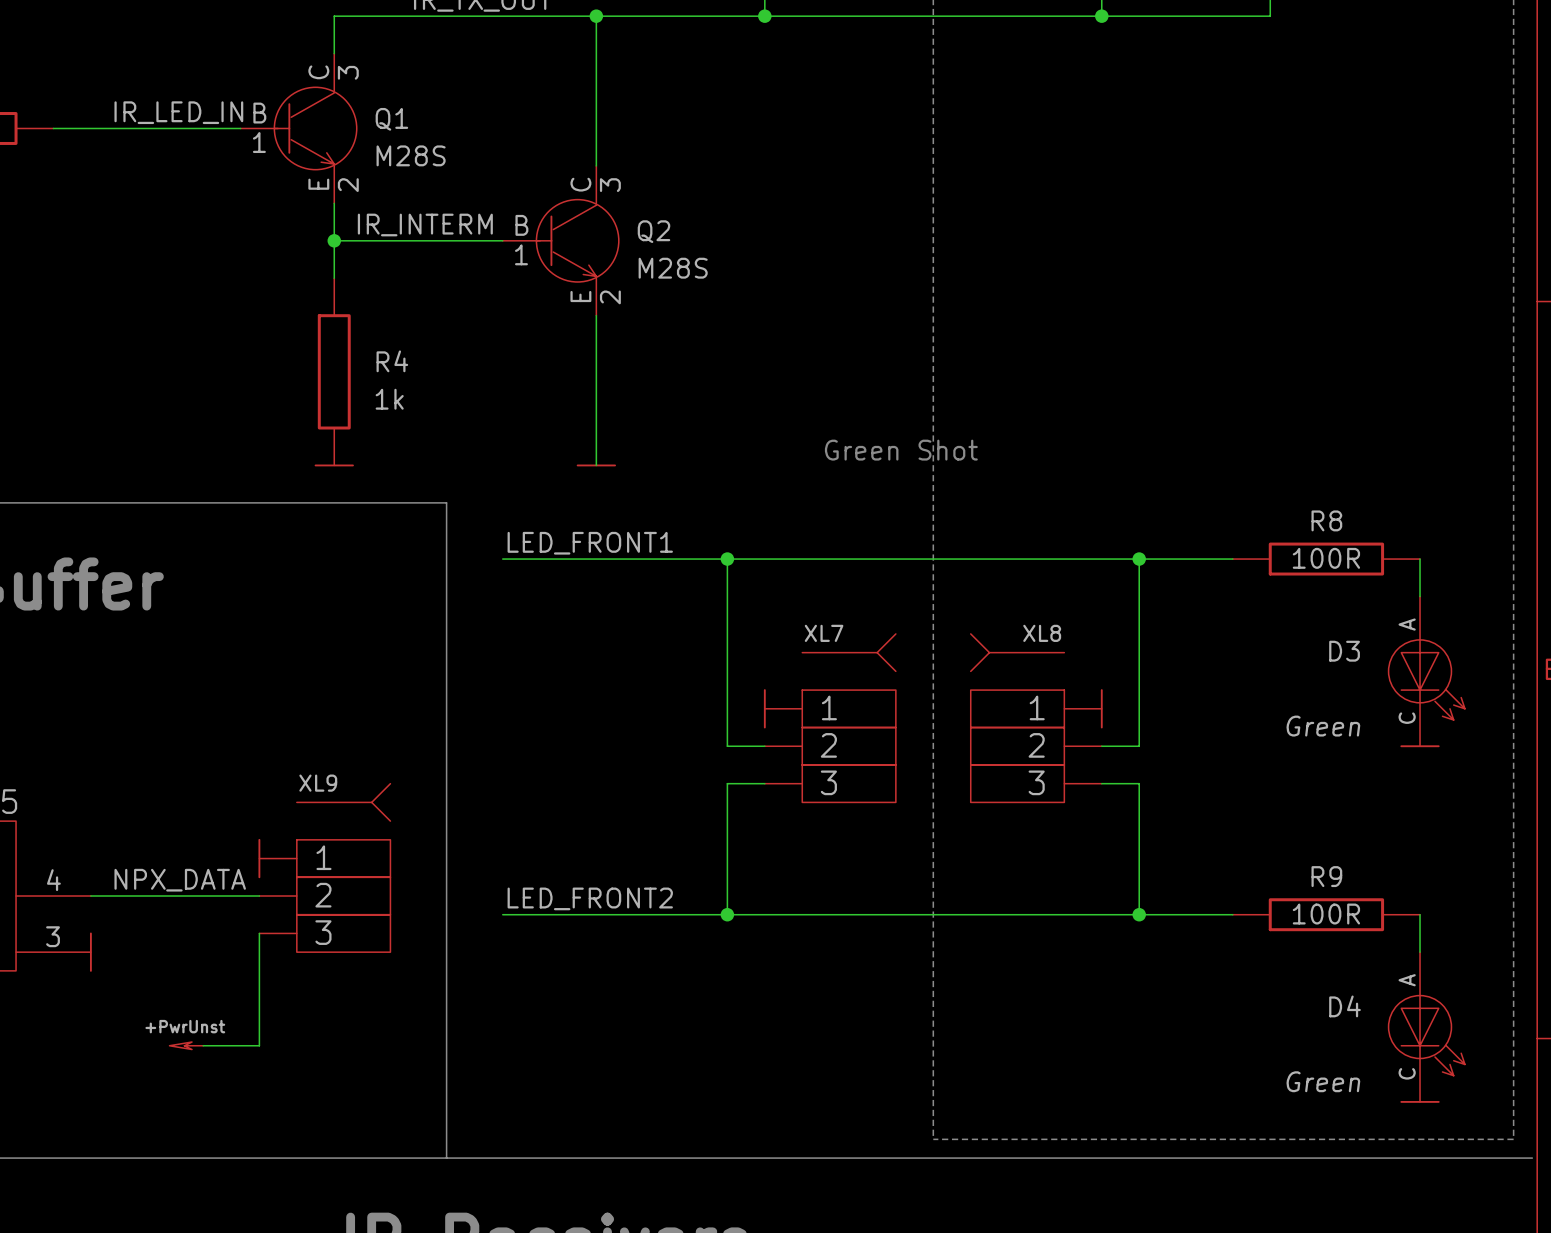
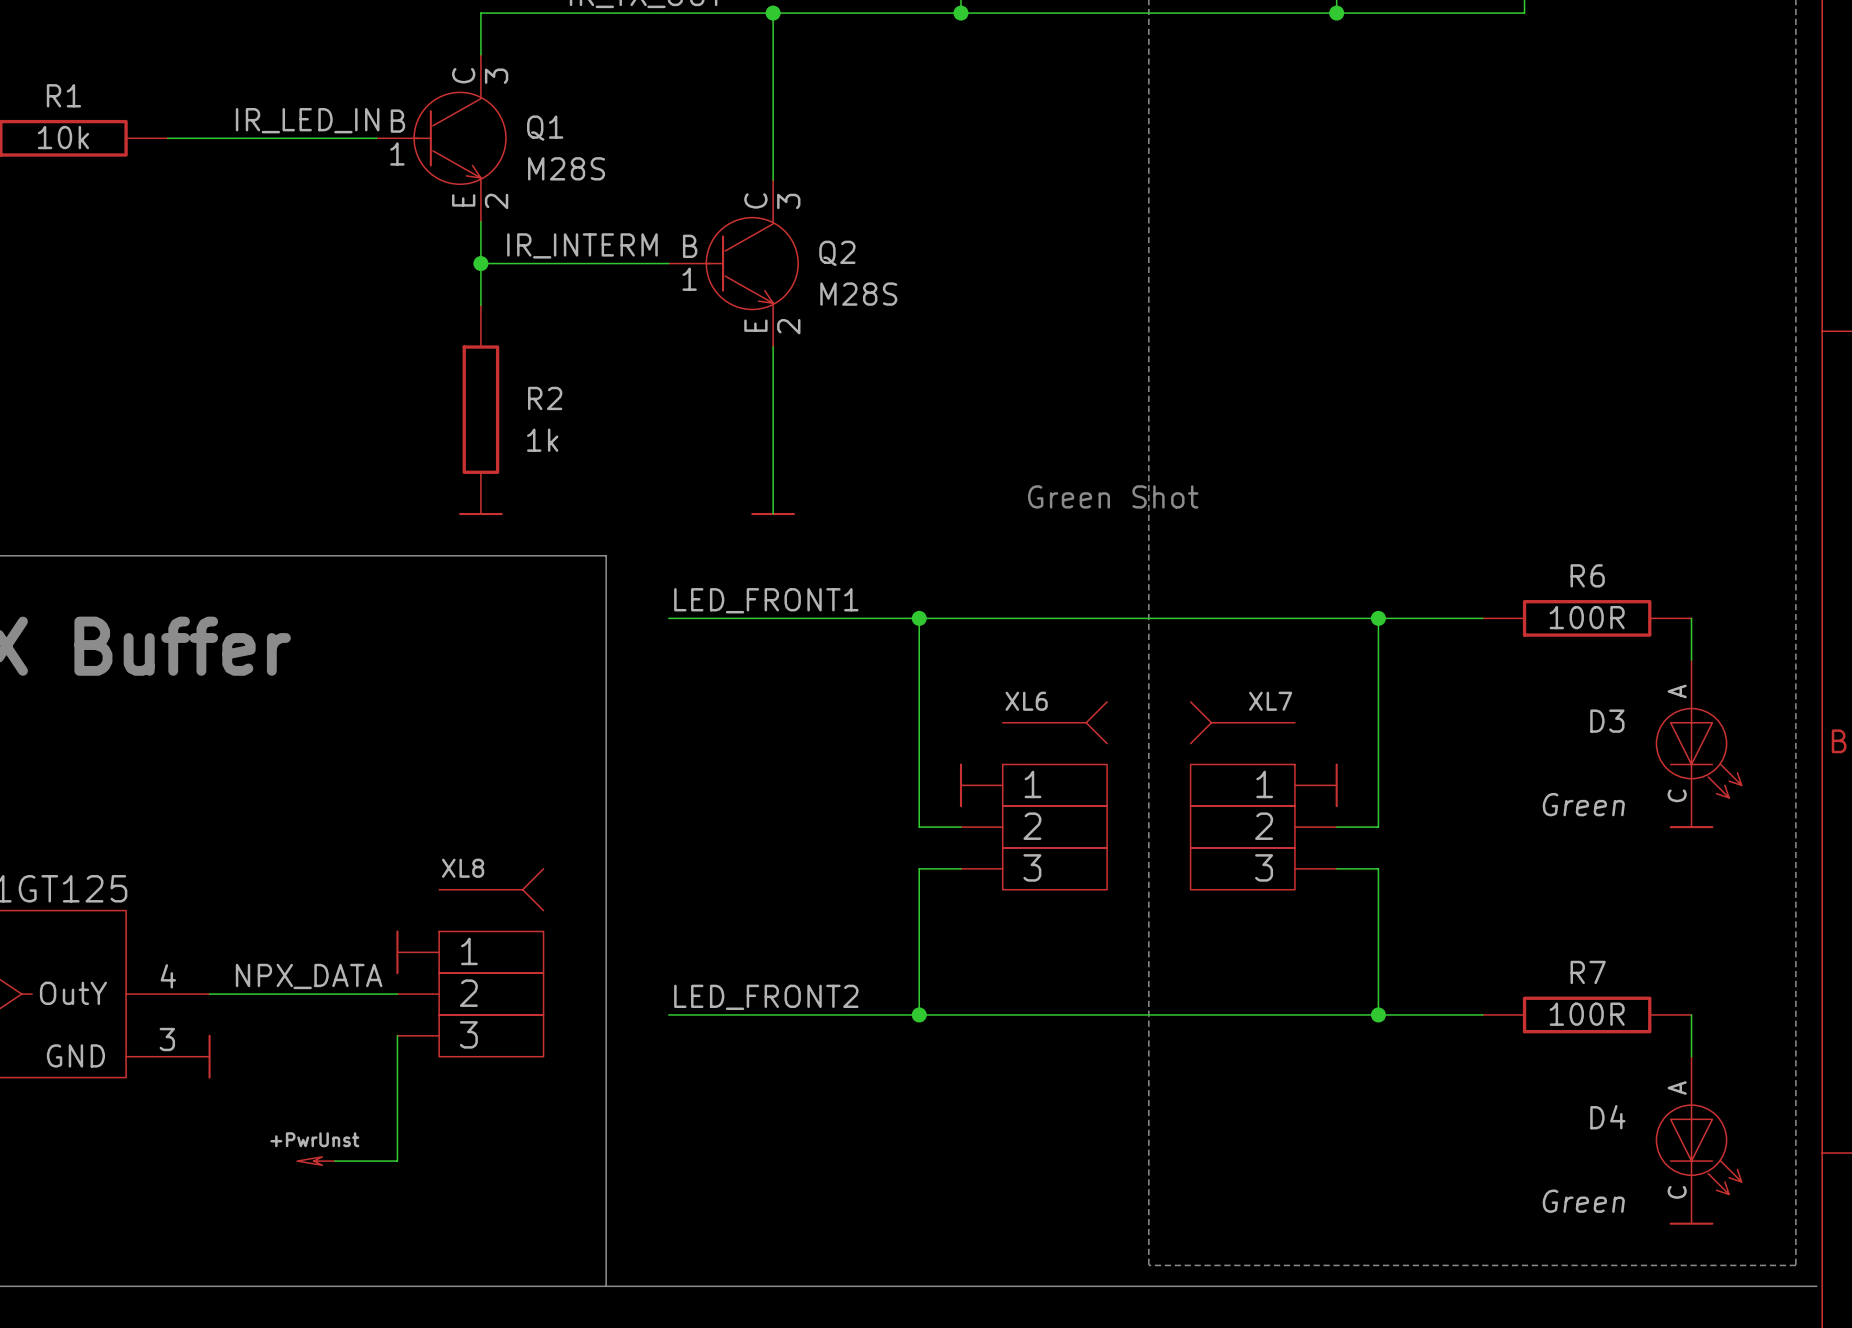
R4 name: R4 (392, 361) -> R2 (545, 398)
R8 name: R8 (1326, 520) -> R6 (1587, 575)
XL7 name: XL7 (824, 633) -> XL6 (1026, 701)
XL8 name: XL8 (1042, 633) -> XL7 (1270, 701)
XL9 name: XL9 (318, 783) -> XL8 (463, 868)
R9 name: R9 (1326, 876) -> R7 (1588, 972)

